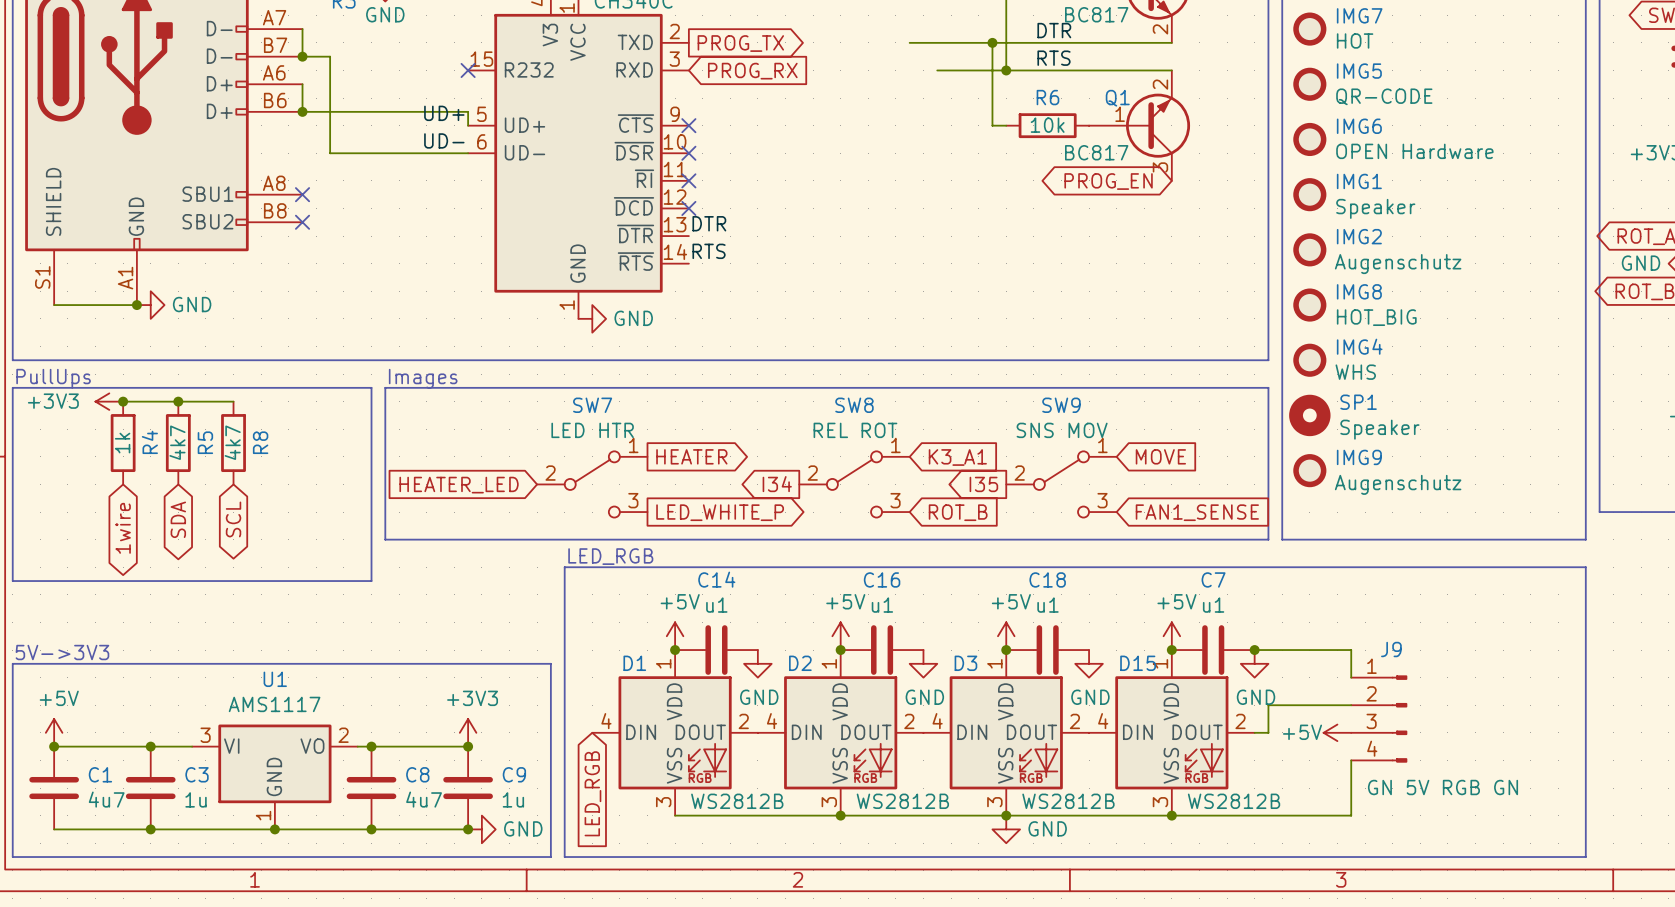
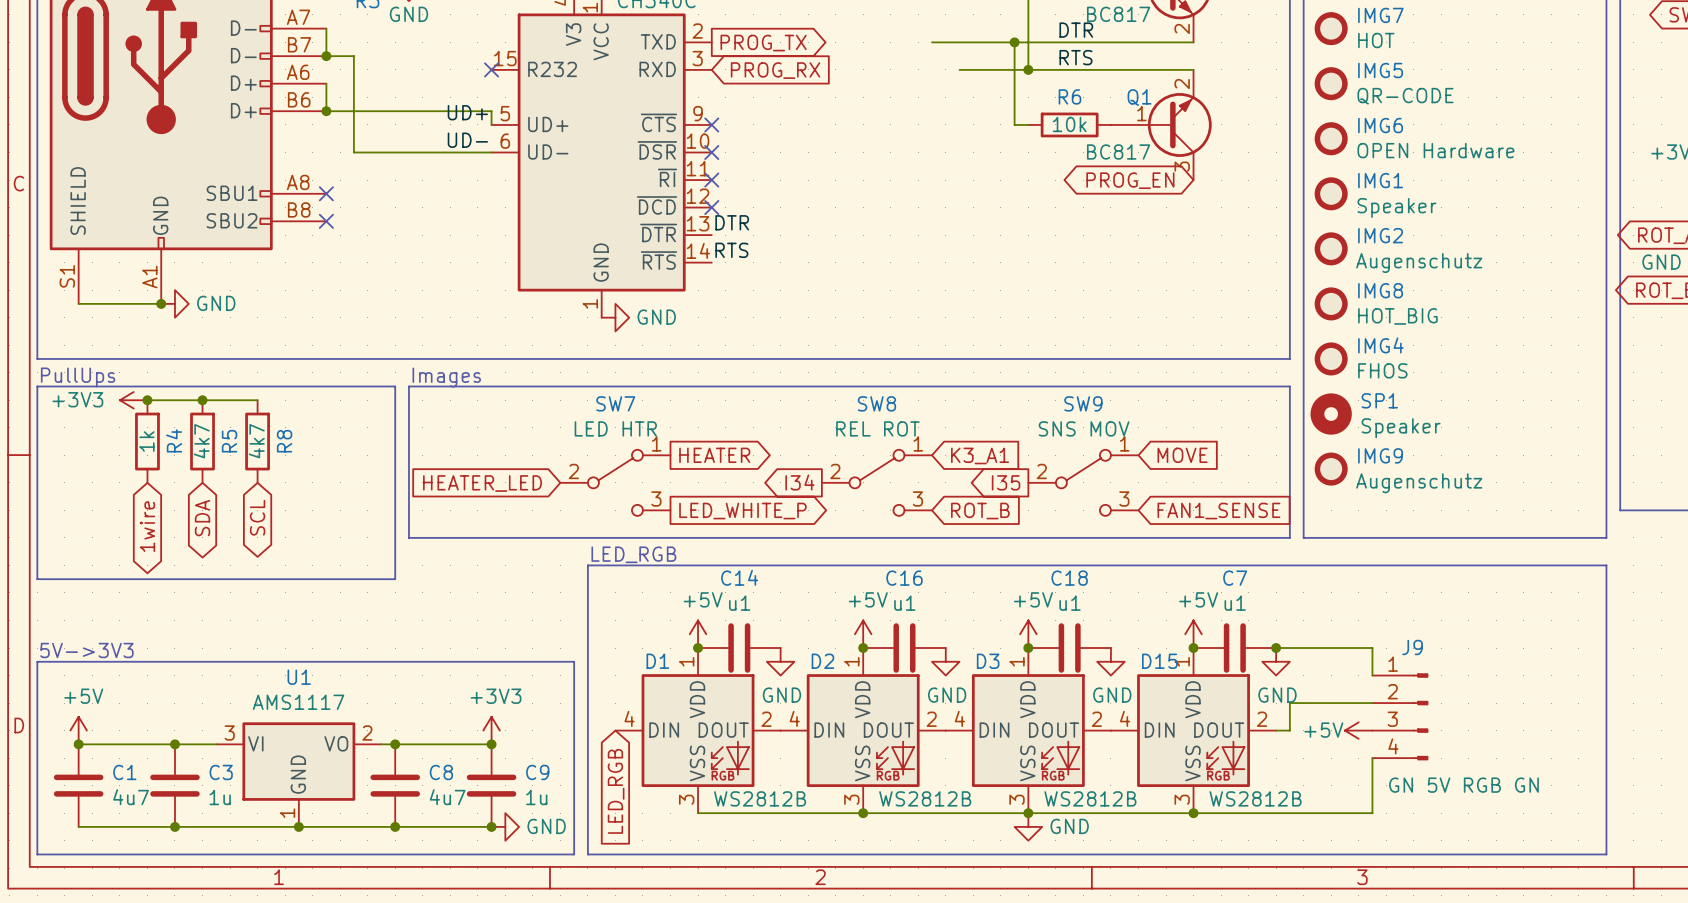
IMG4 value: WHS (1355, 372) -> FHOS (1382, 370)

